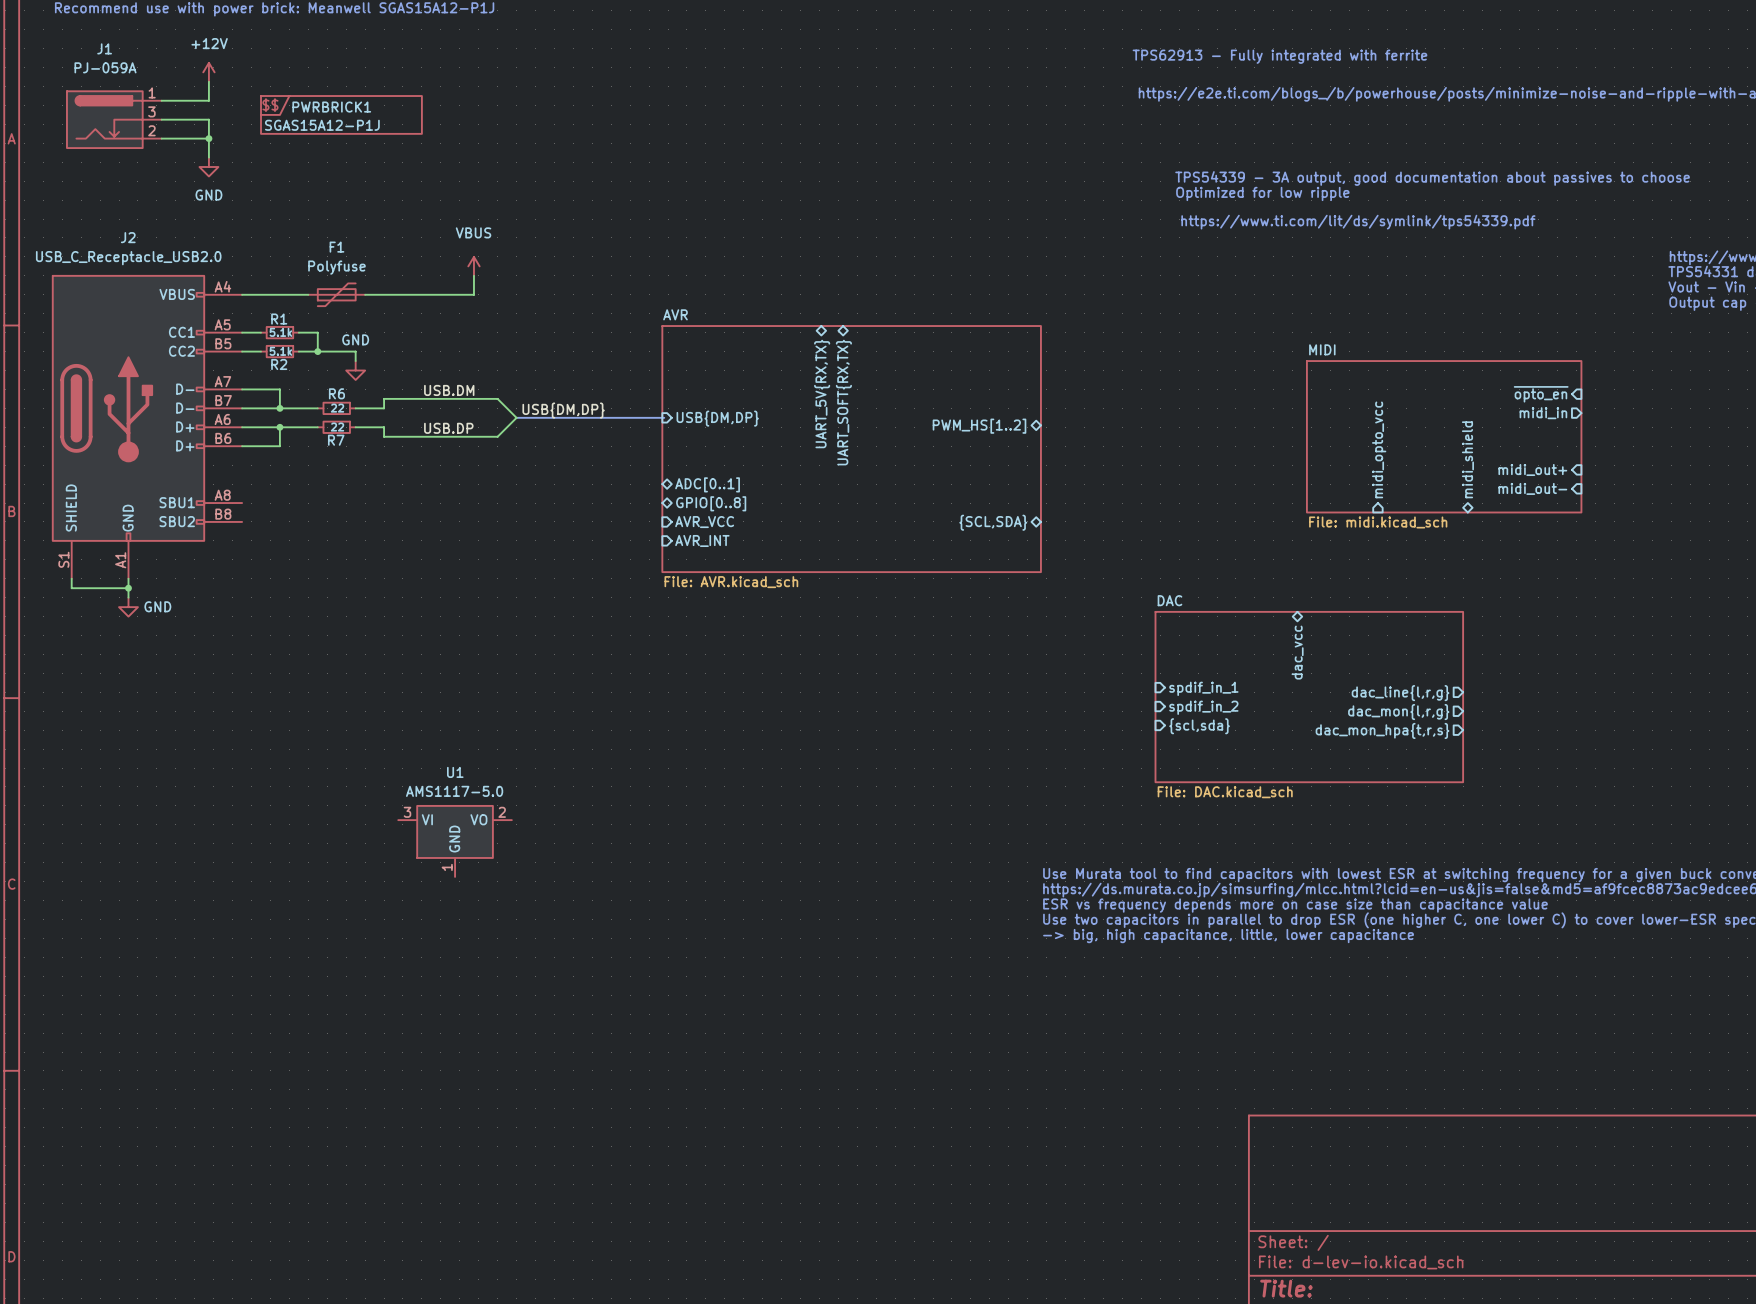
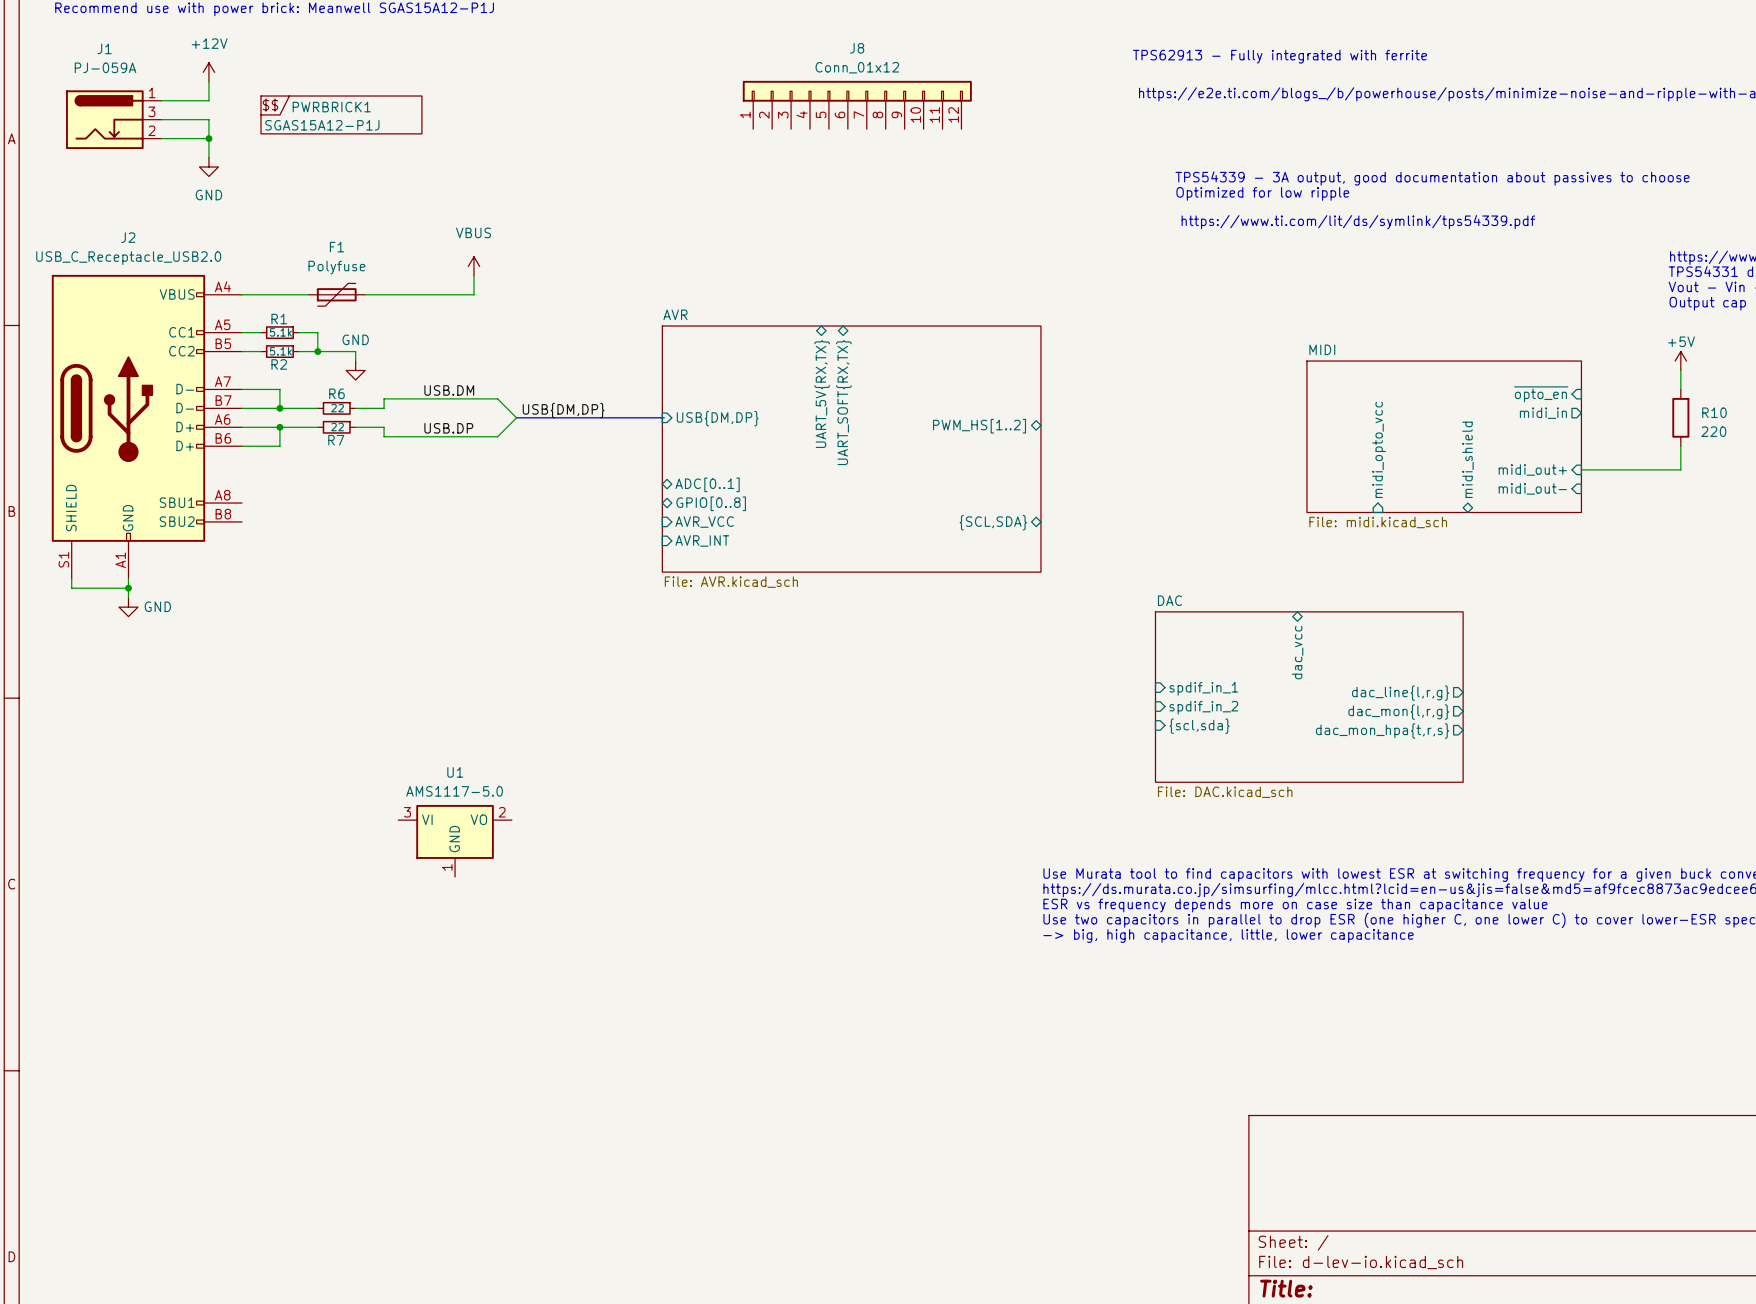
J8: none -> Conn_01x12 (857, 105)
power symbol: none -> +5V (1680, 361)
wire: none -> (1680, 370) (1680, 389)
R10: none -> 220 (1680, 417)
wire: none -> (1680, 446) (1680, 469) (1581, 469)

